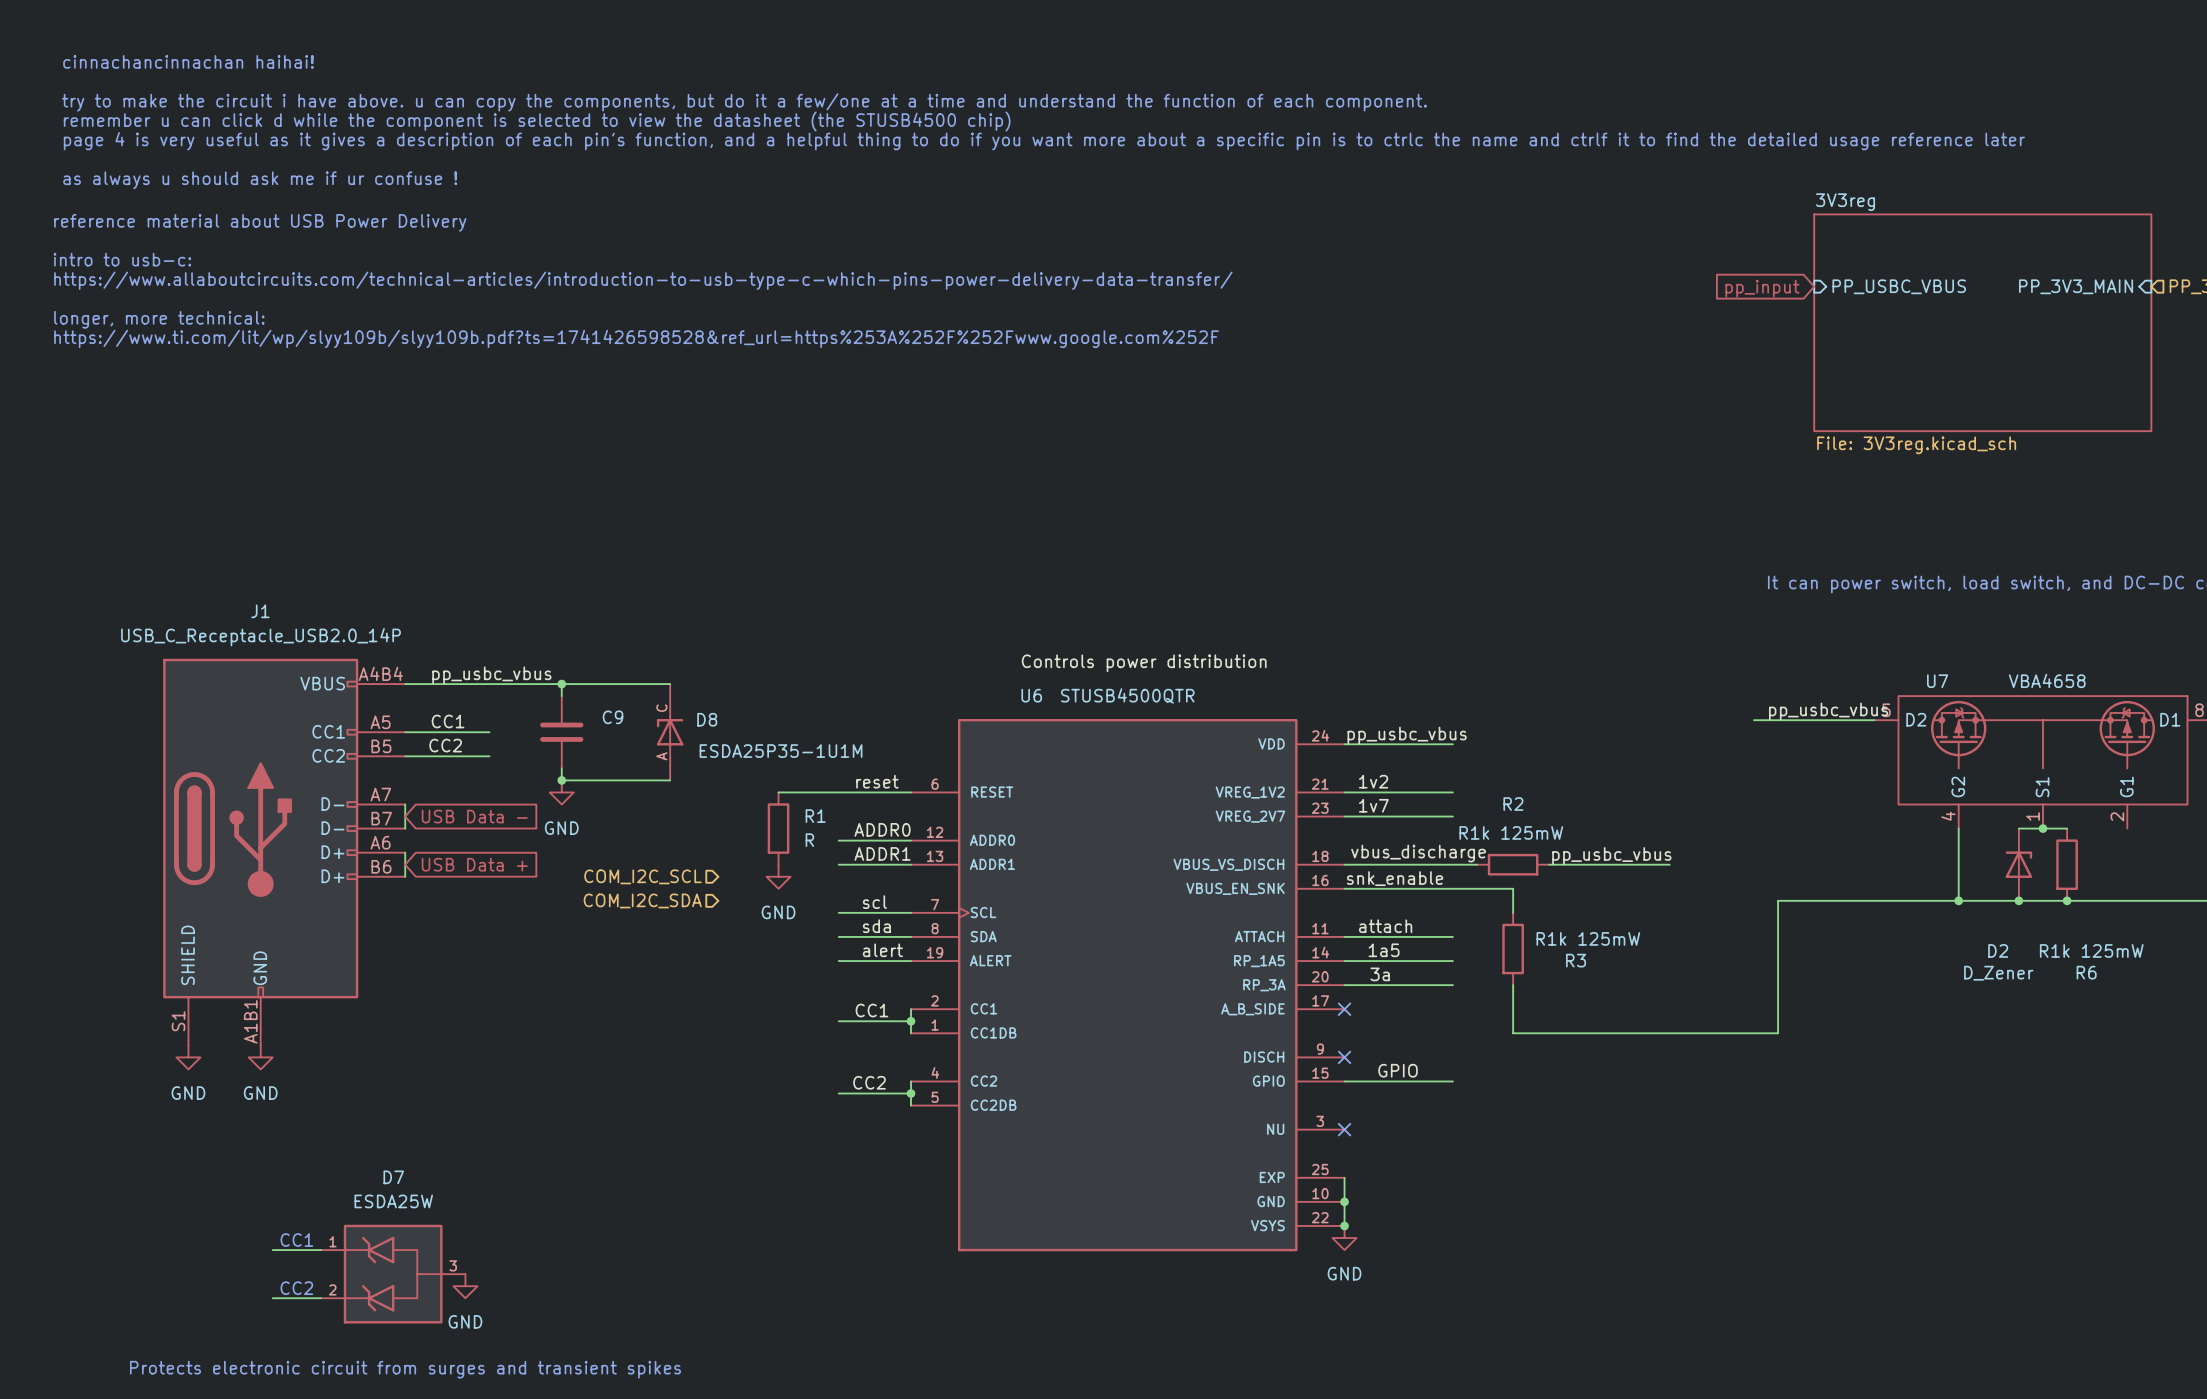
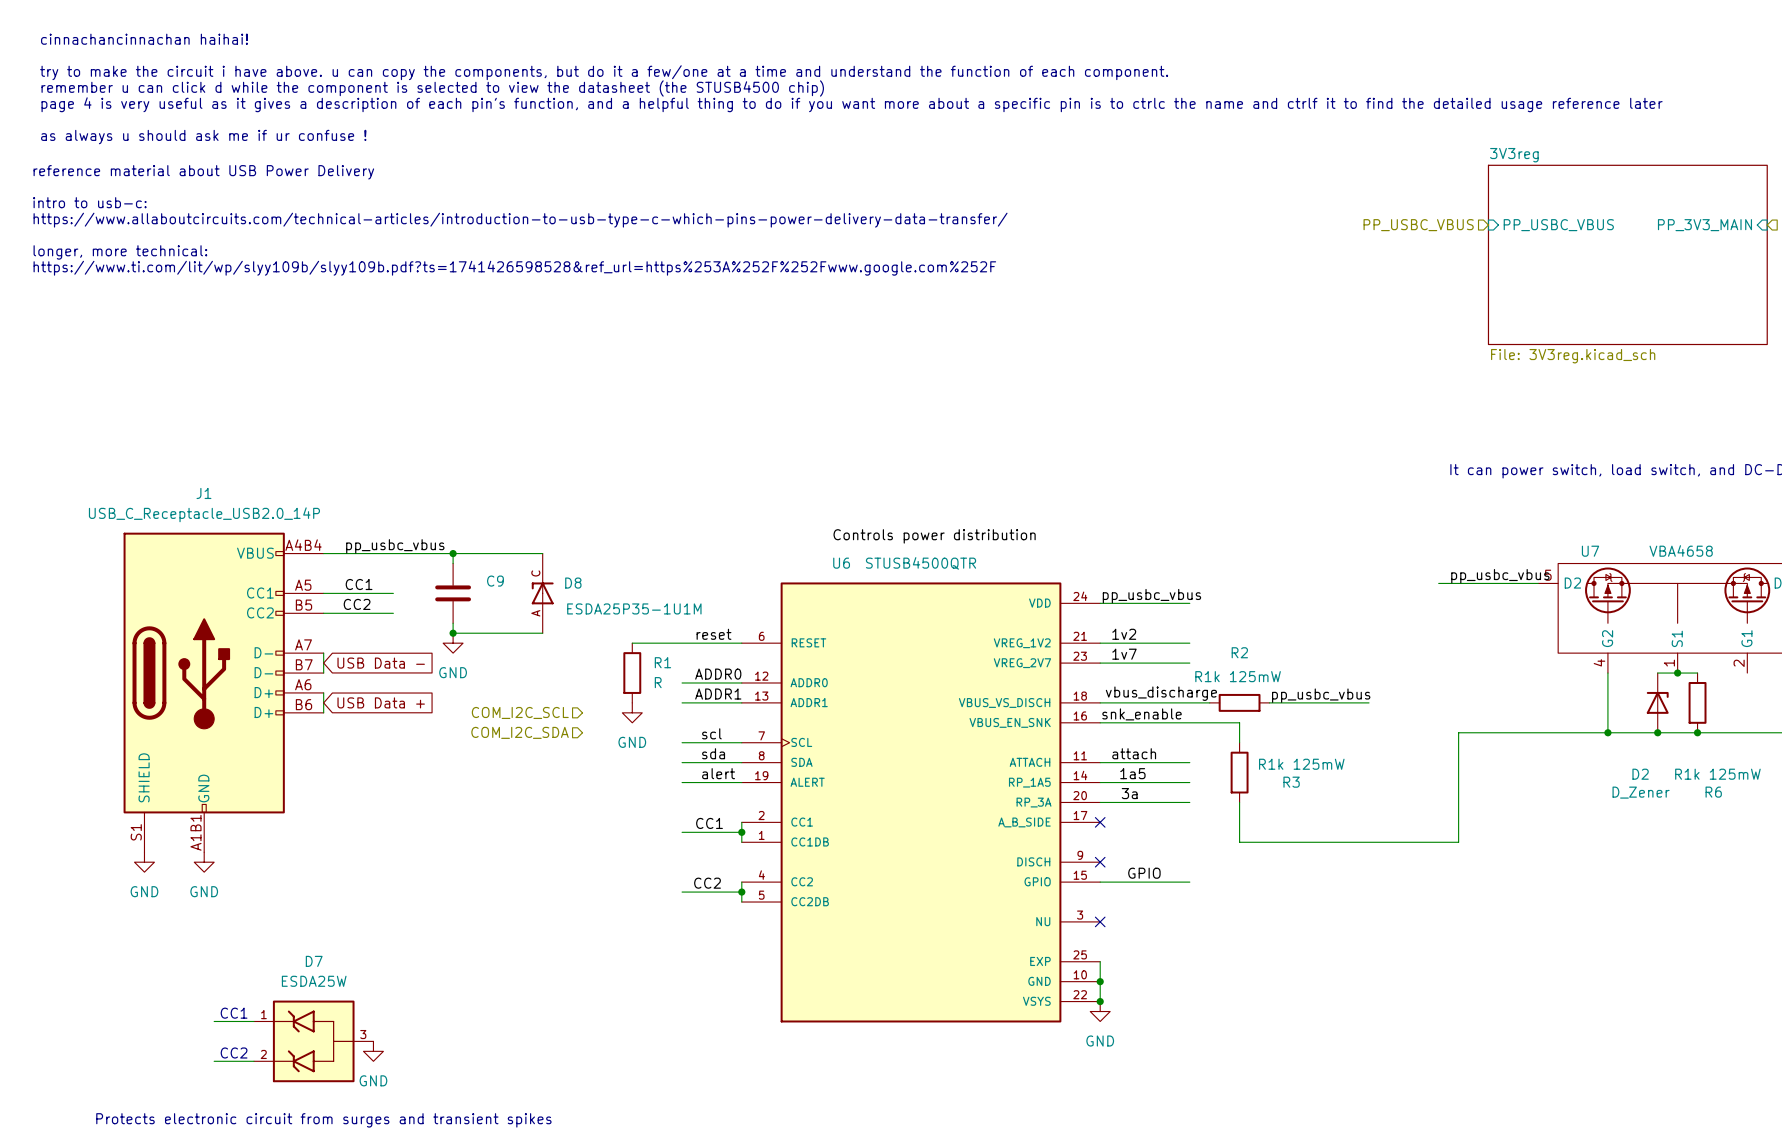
hierarchical label: none -> PP_USBC_VBUS (1418, 225)
global label: pp_input (1762, 288) -> none

